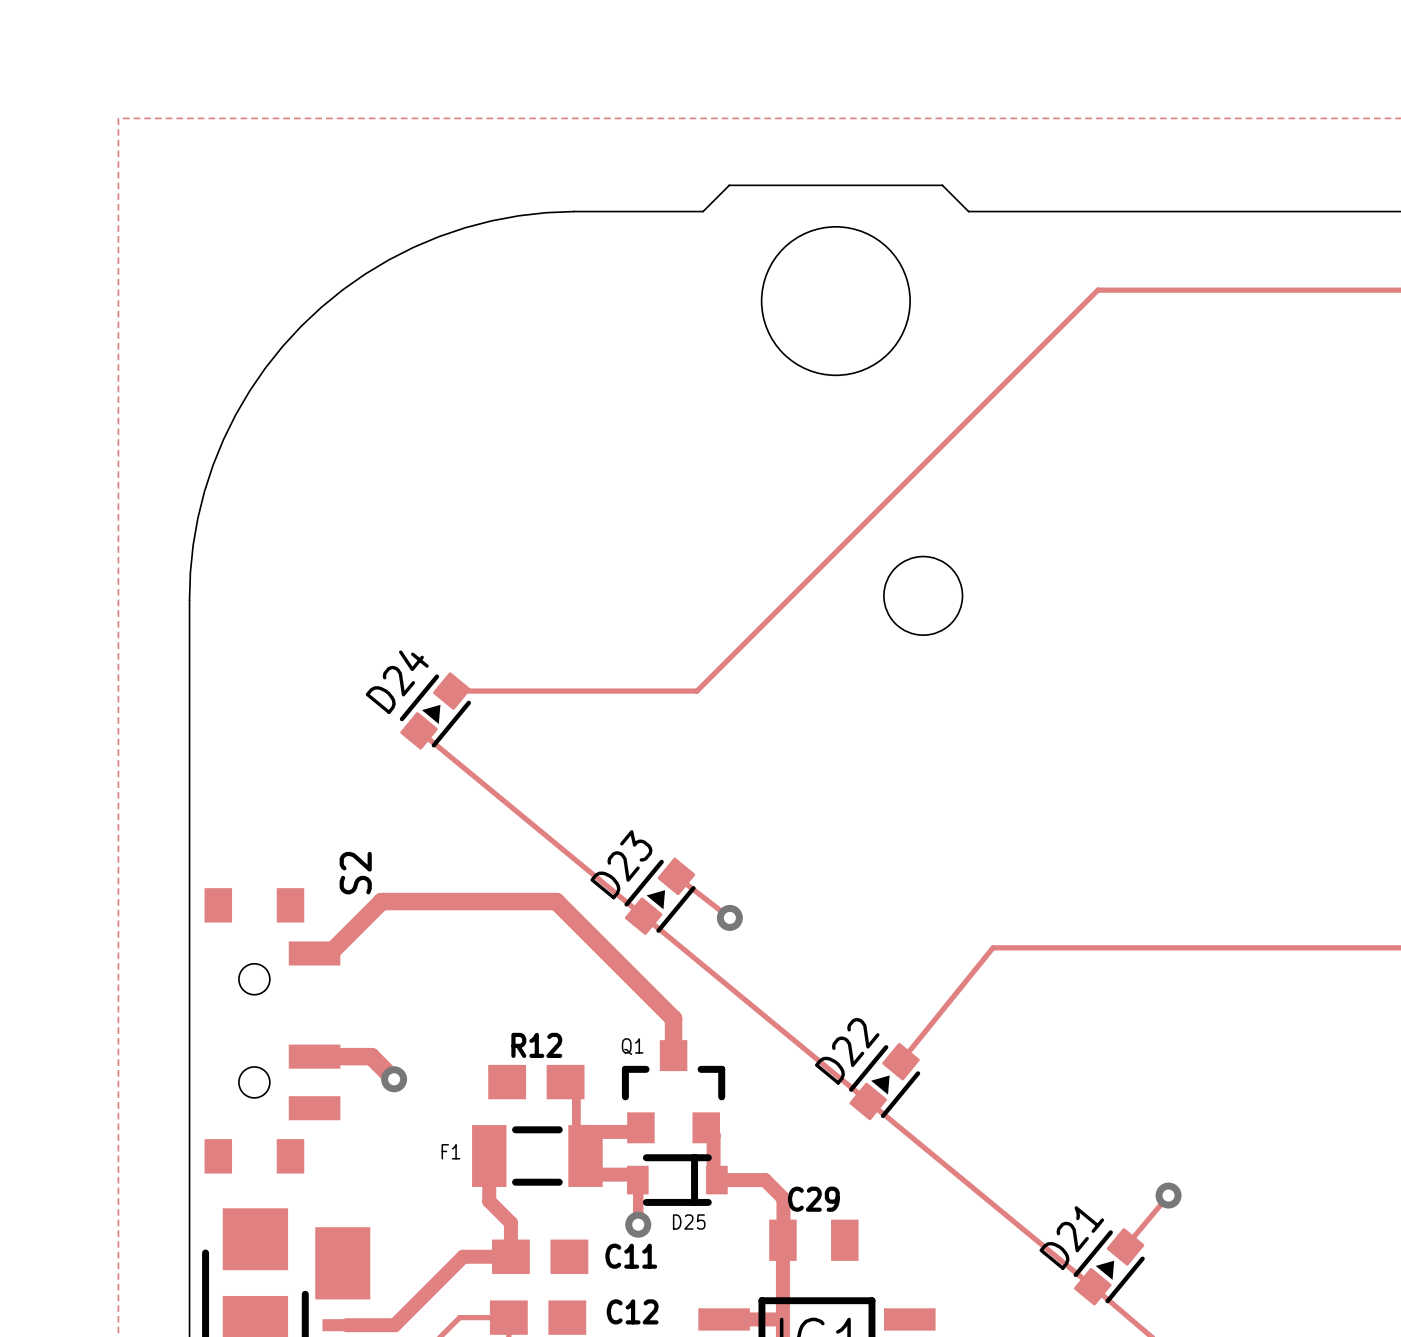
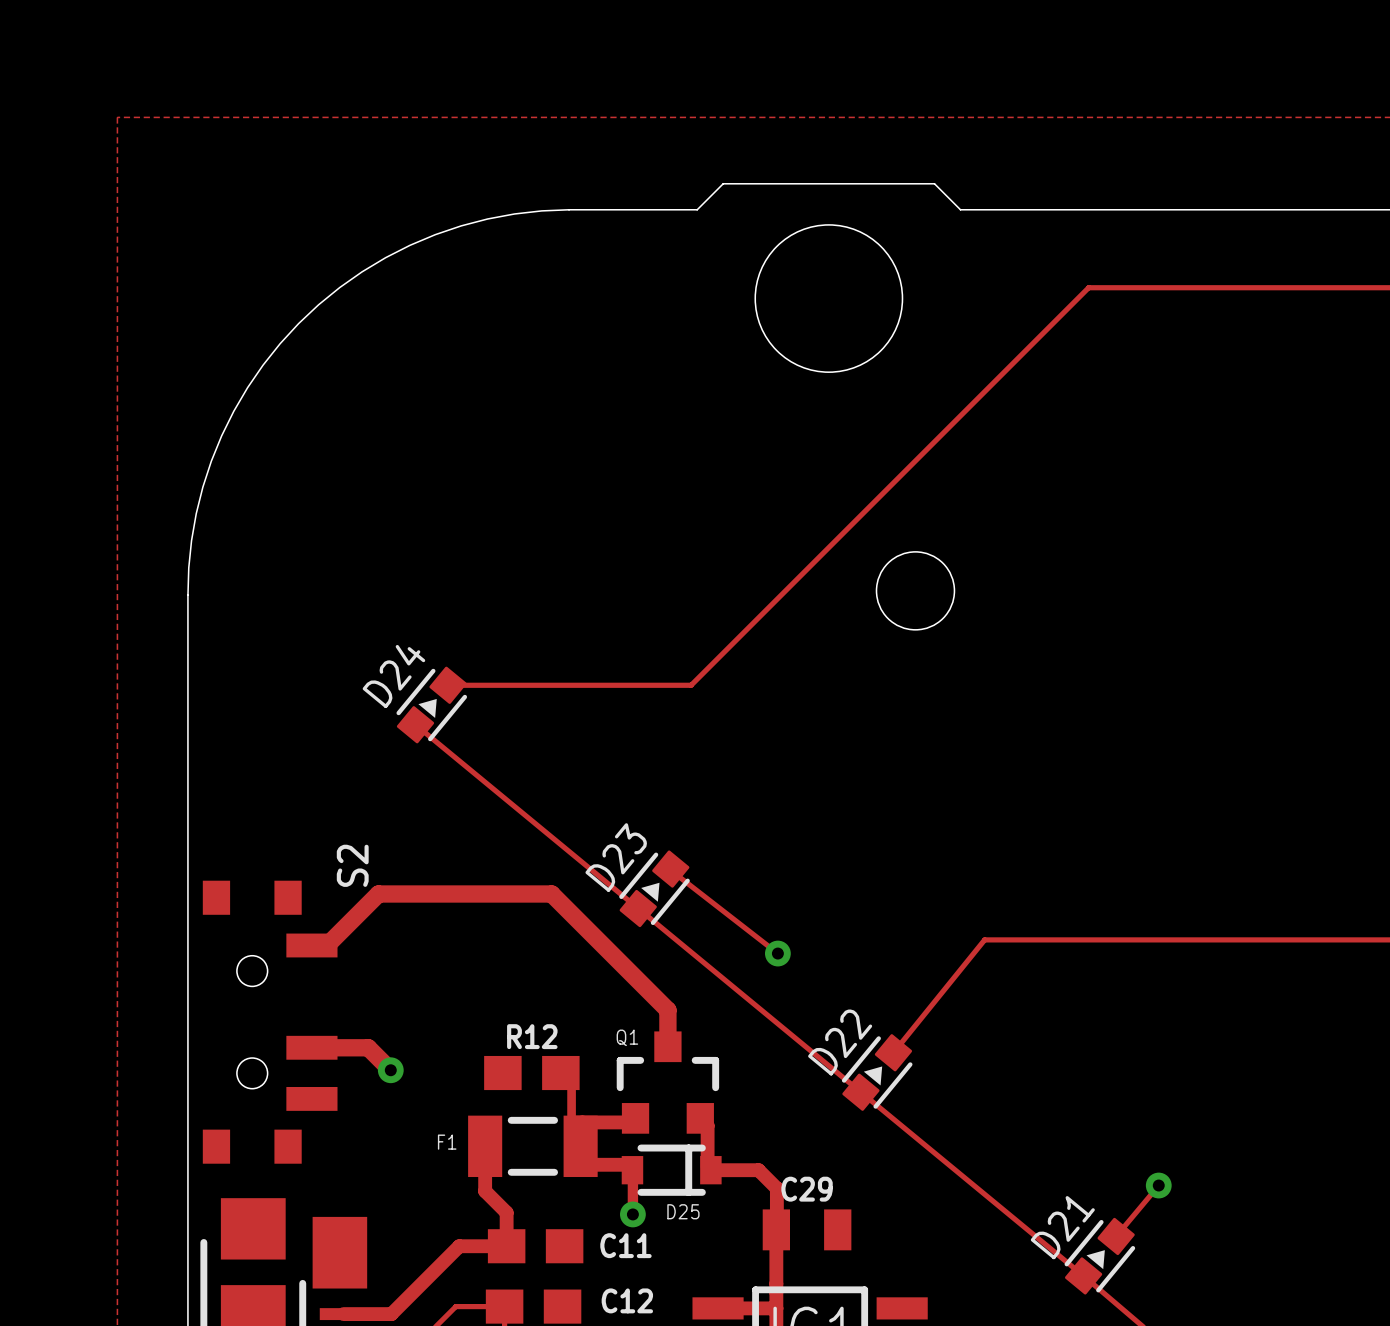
track: (676, 876) (729, 917) -> (670, 869) (777, 953)
via position: (729, 917) -> (777, 953)

